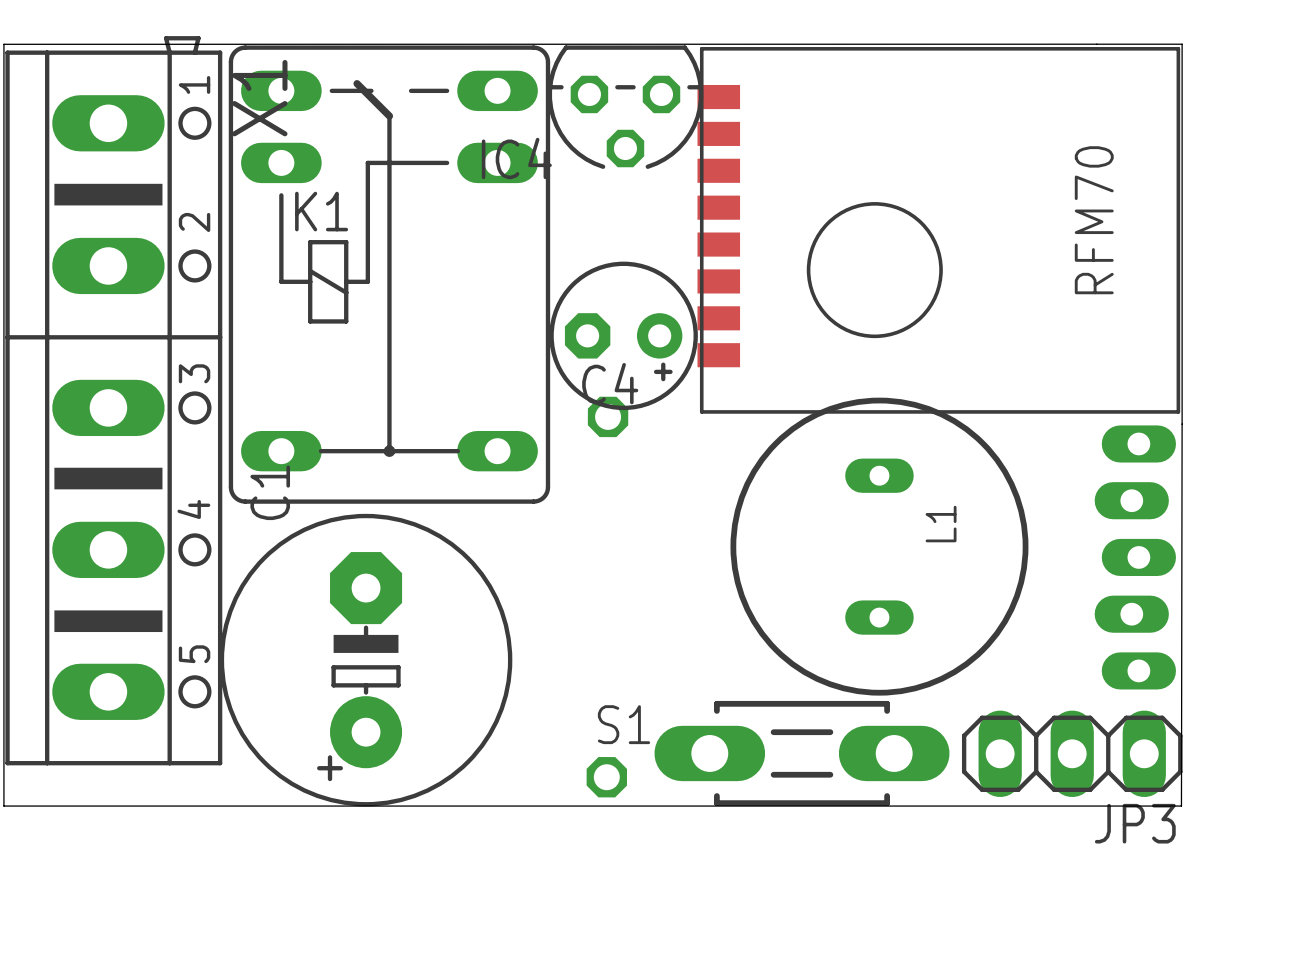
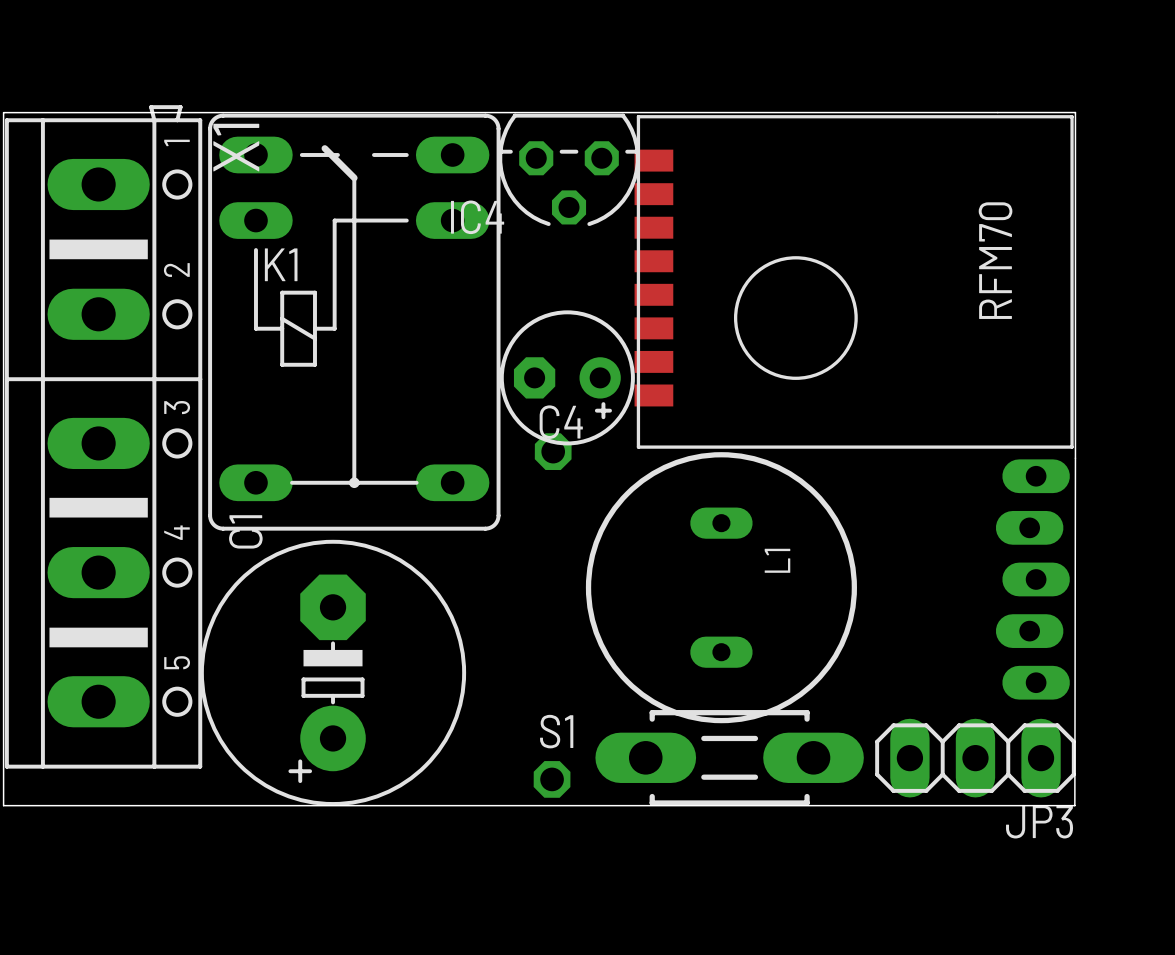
L1 position: (879, 546) -> (721, 587)

